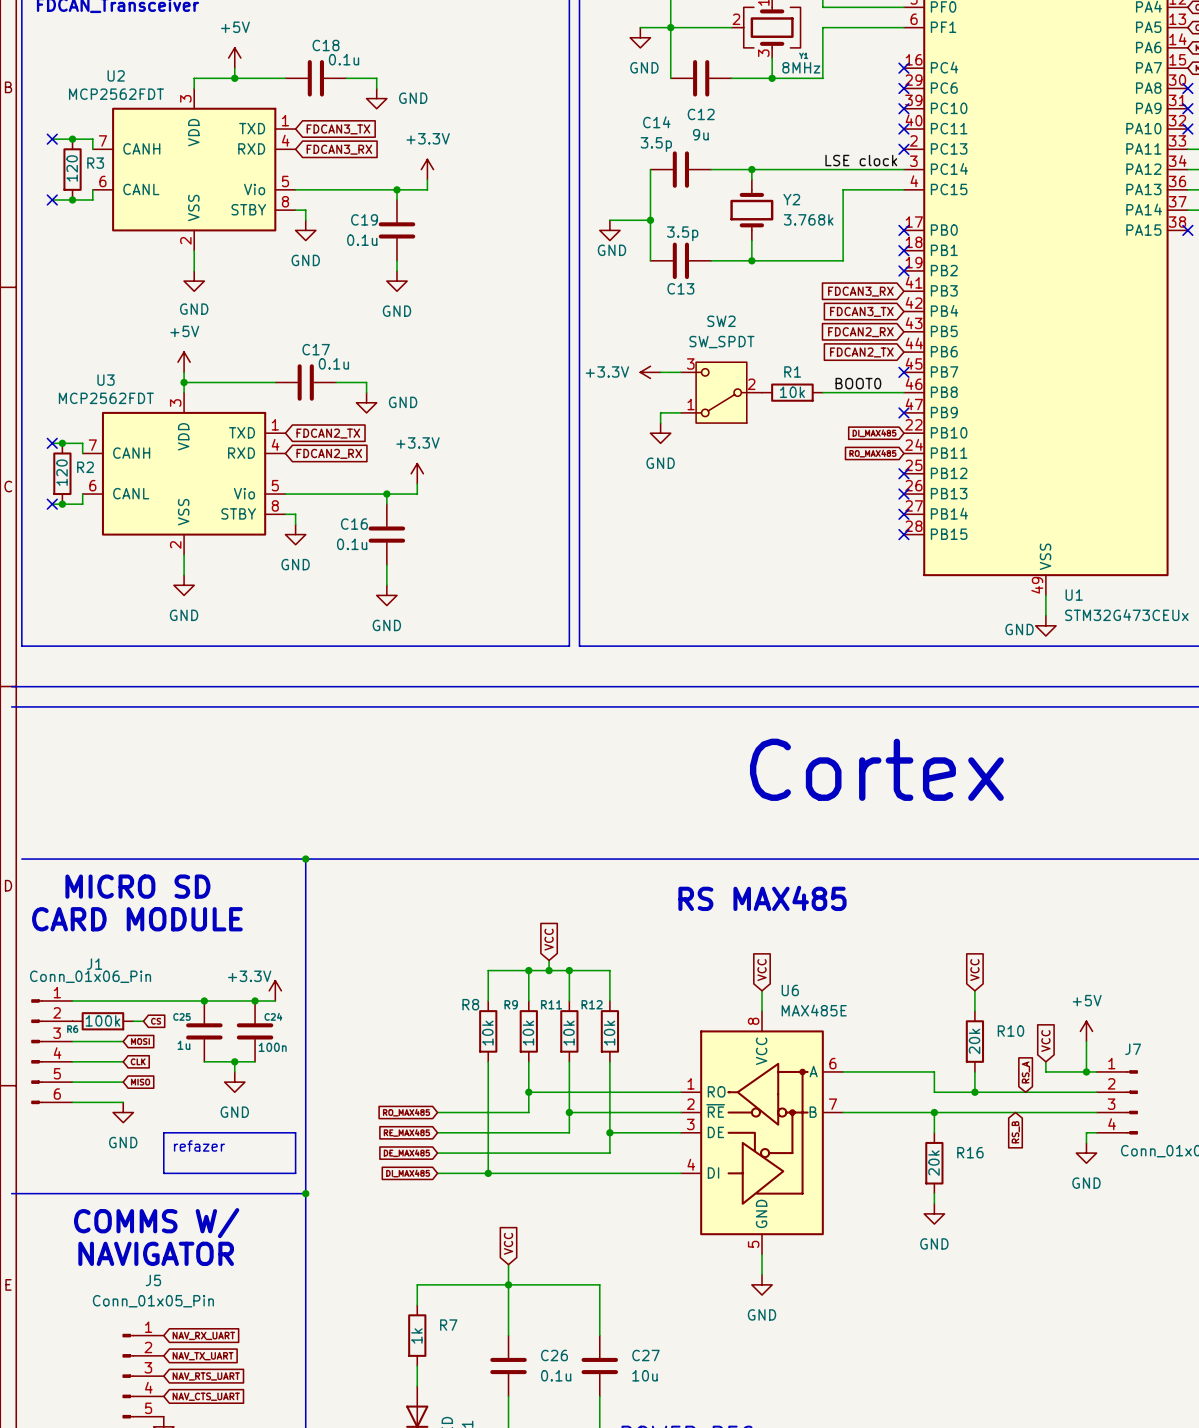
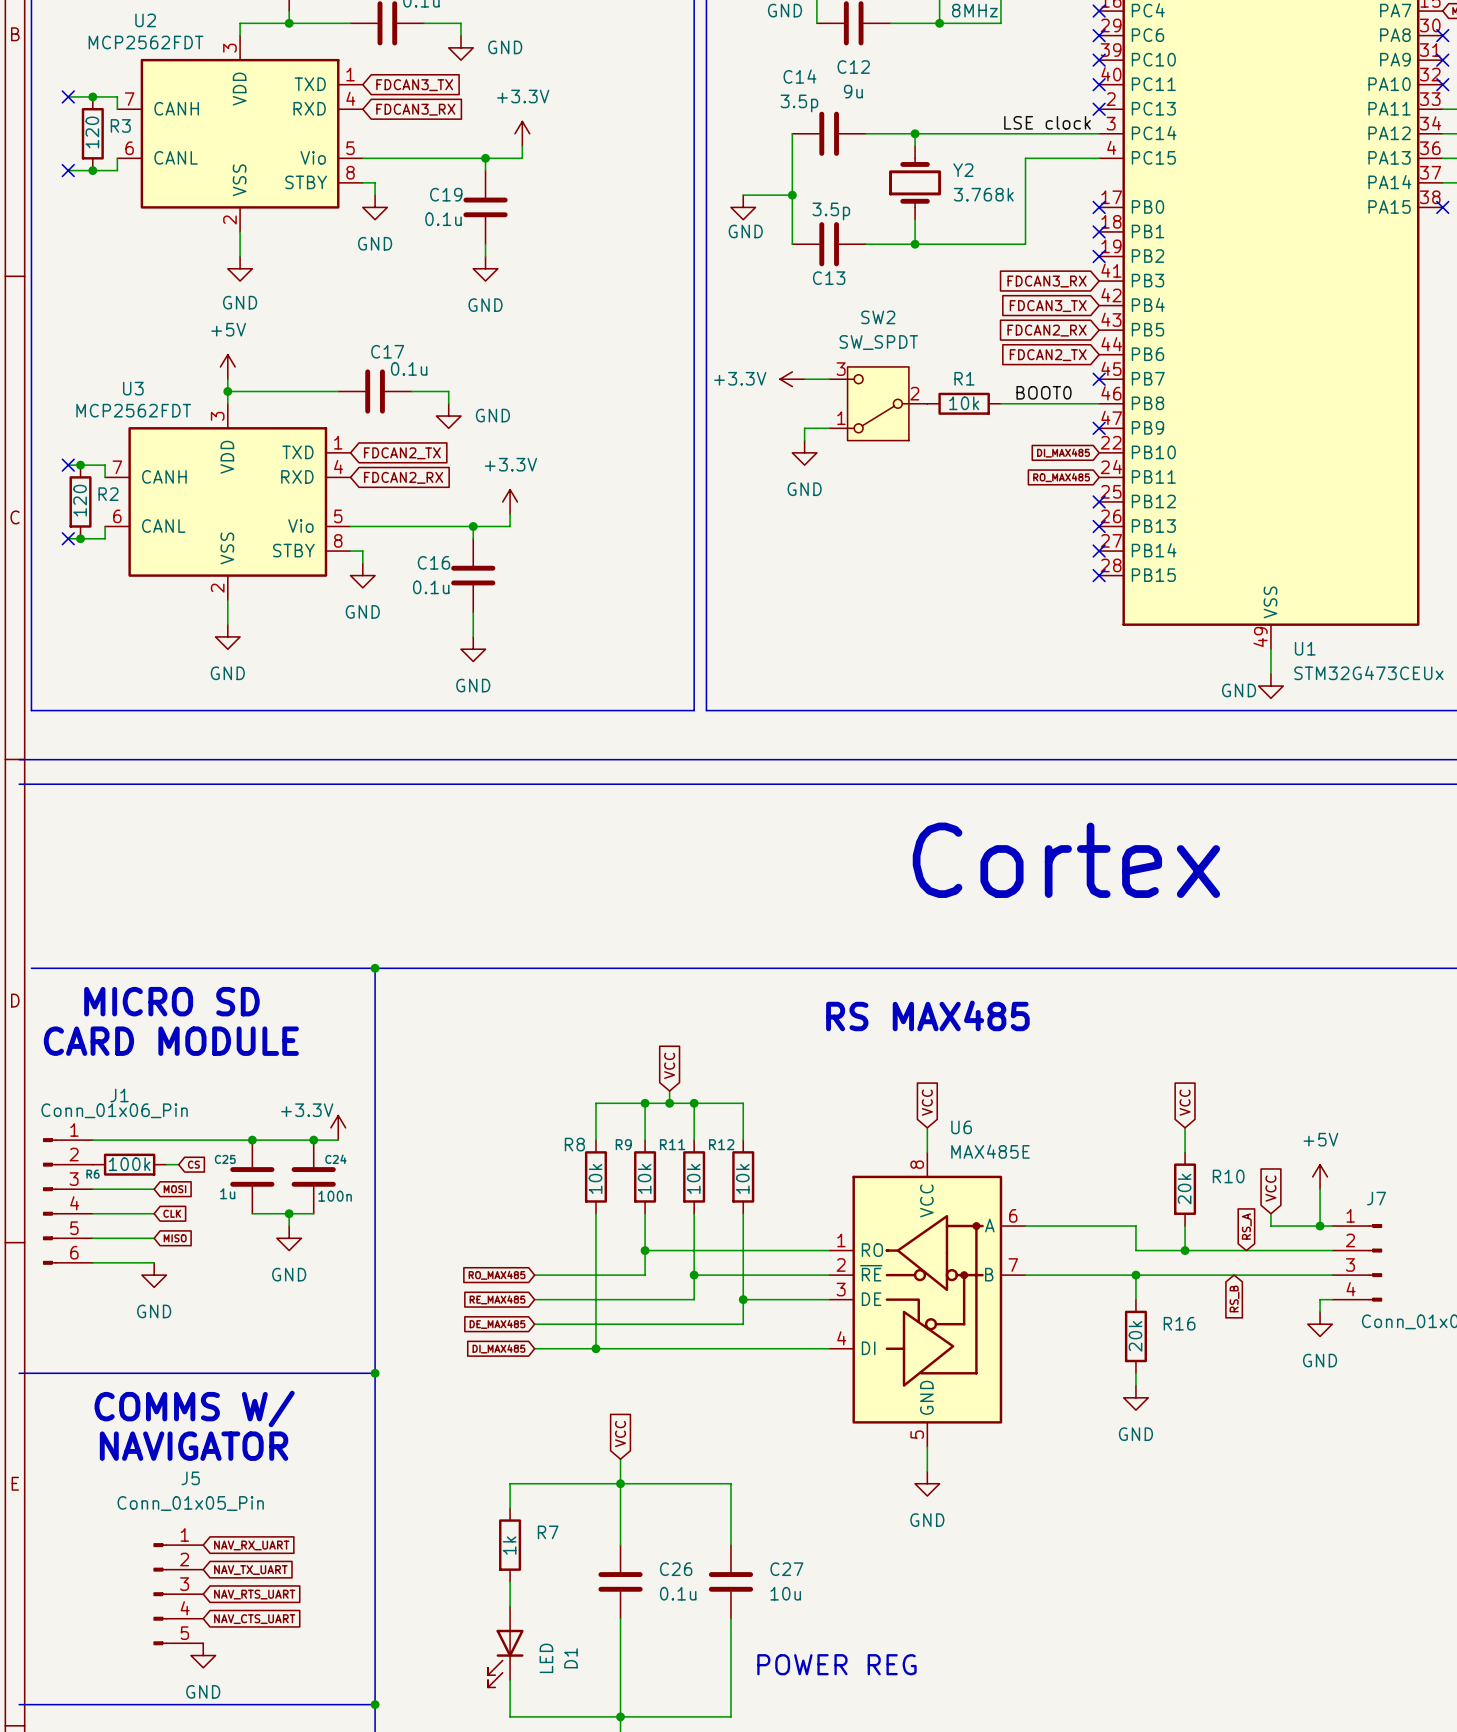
line: (163, 1132) (295, 1132) (295, 1173) (163, 1173) (163, 1132) -> none
text: refazer (199, 1145) -> none

